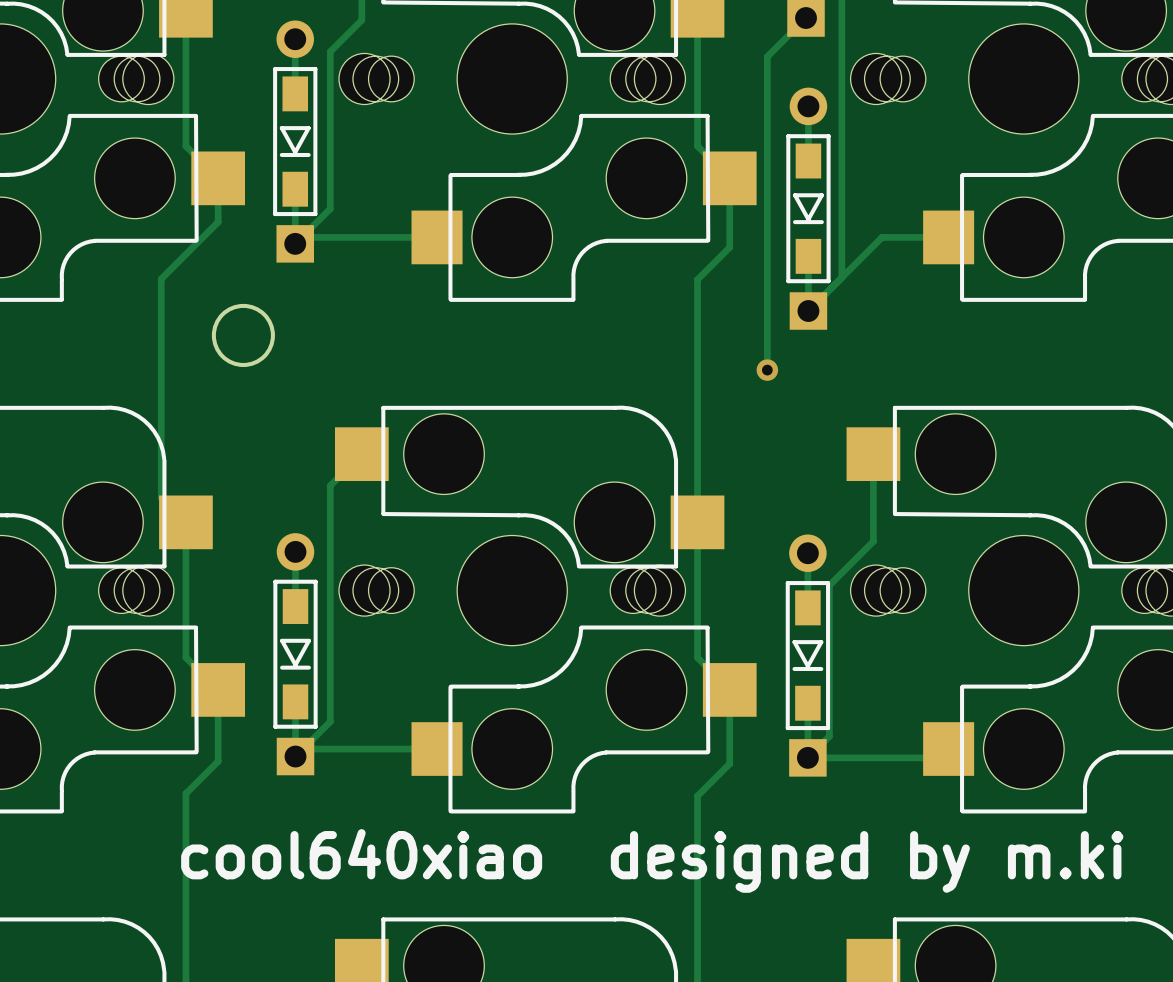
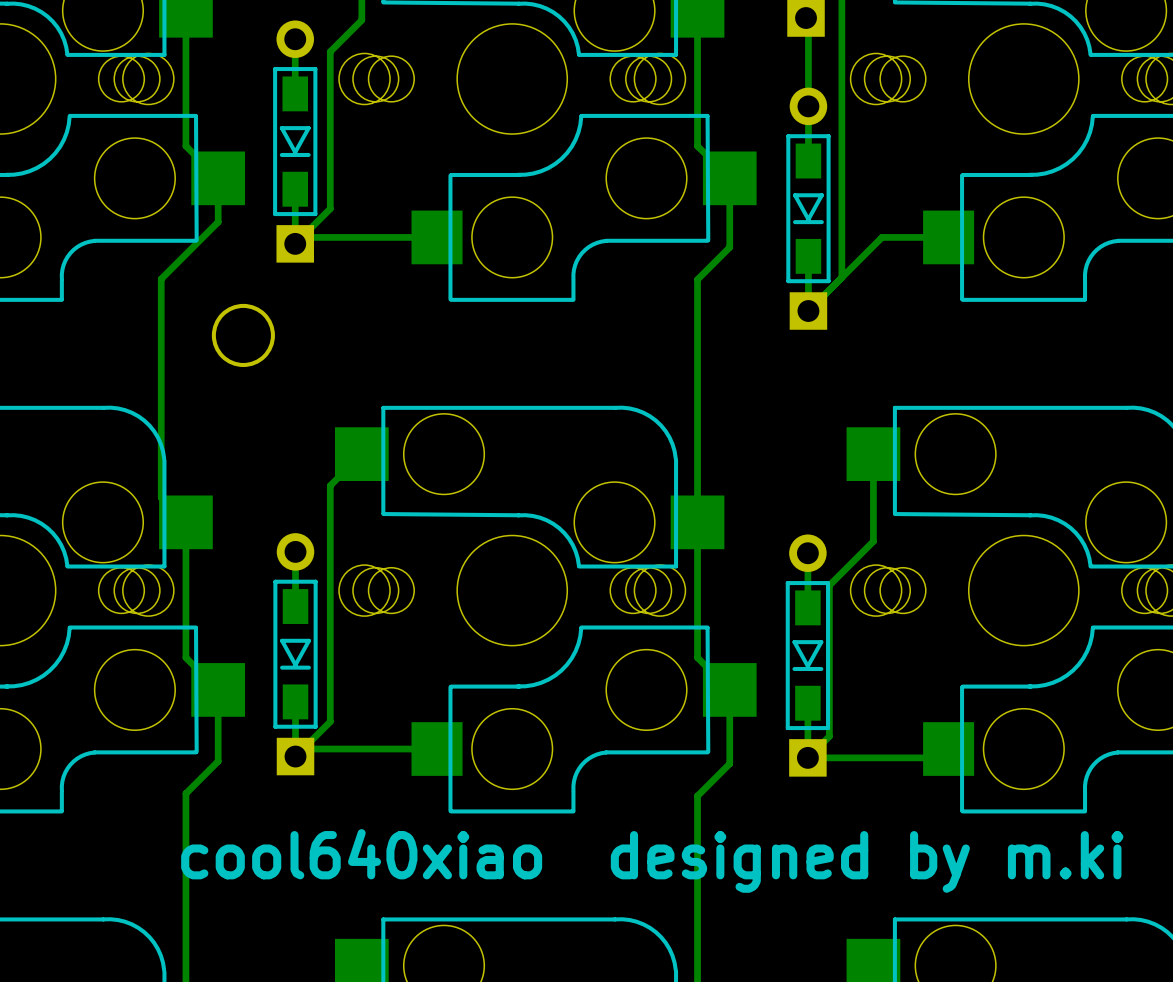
track: (806, 18) (767, 56) (767, 370) -> (806, 18) (808, 20) (808, 106)
via: (767, 370) -> none

